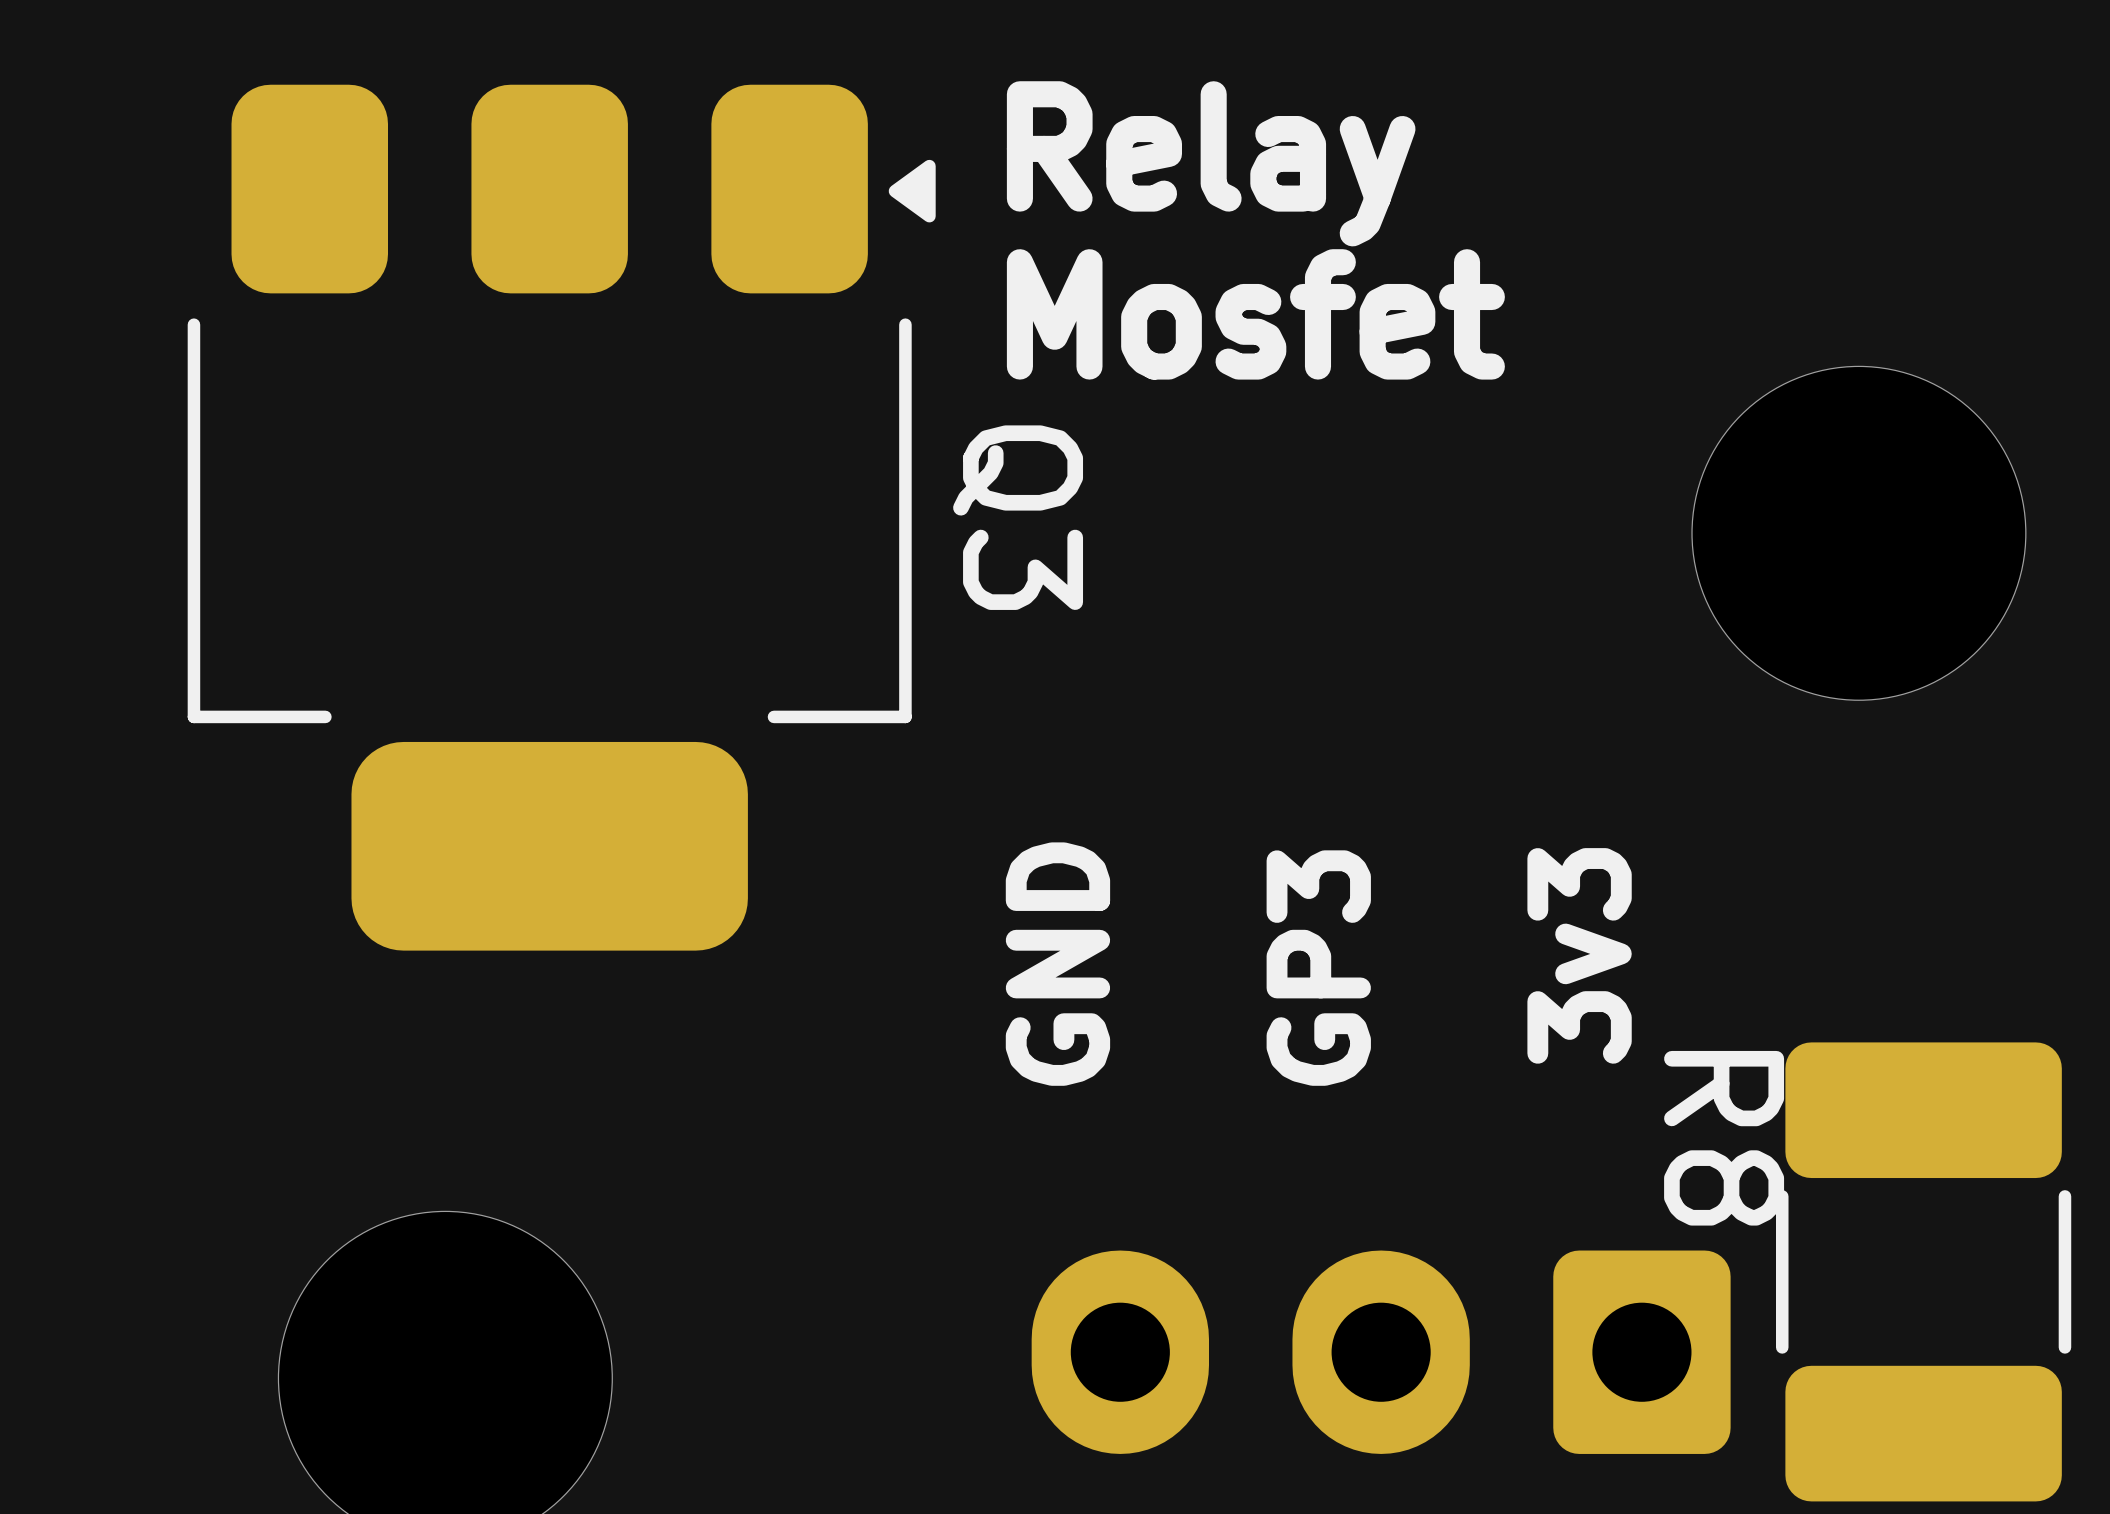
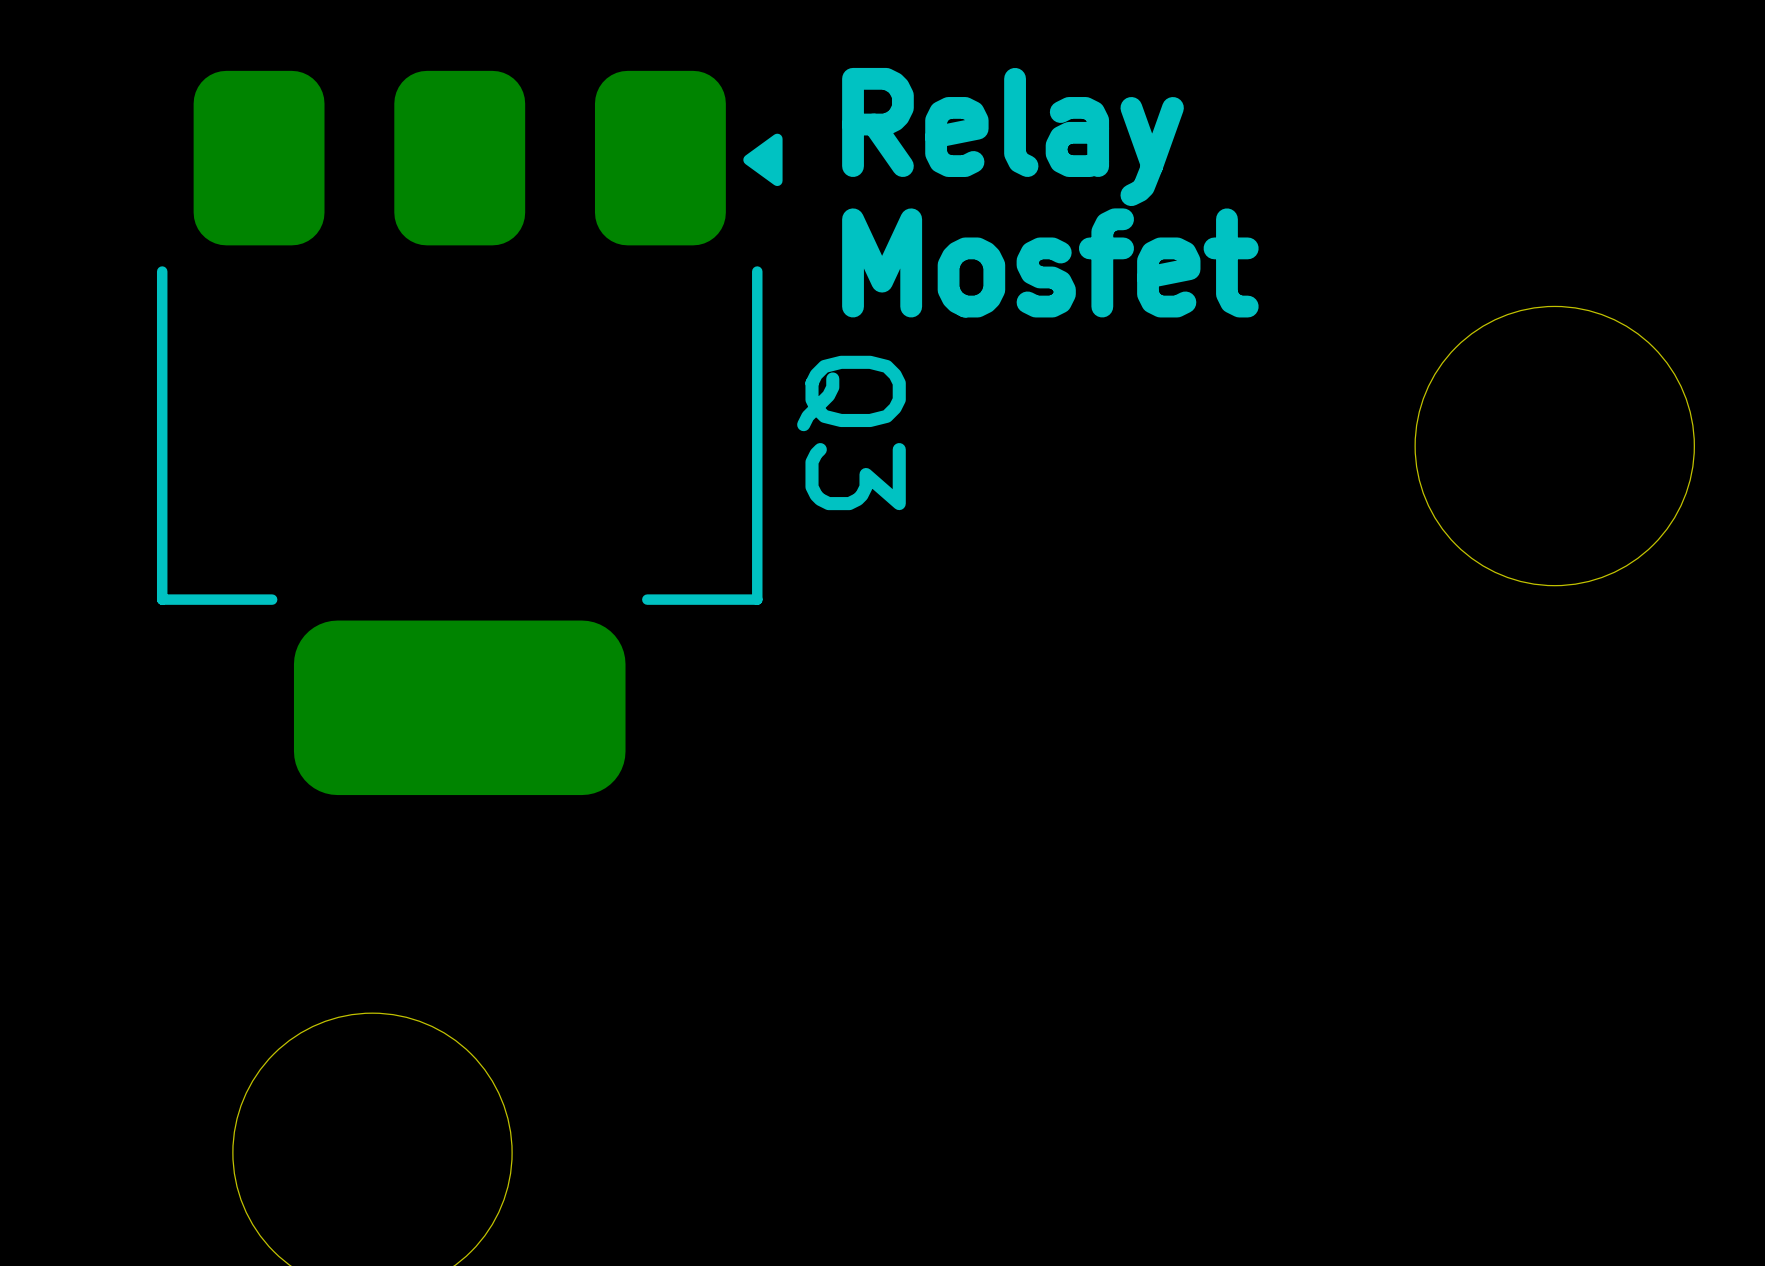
text: 3v3 (1579, 955) -> none
text: GND (1057, 964) -> none
text: GP3 (1318, 968) -> none
R8: (1923, 1271) -> none
part: (1381, 1352) -> none

